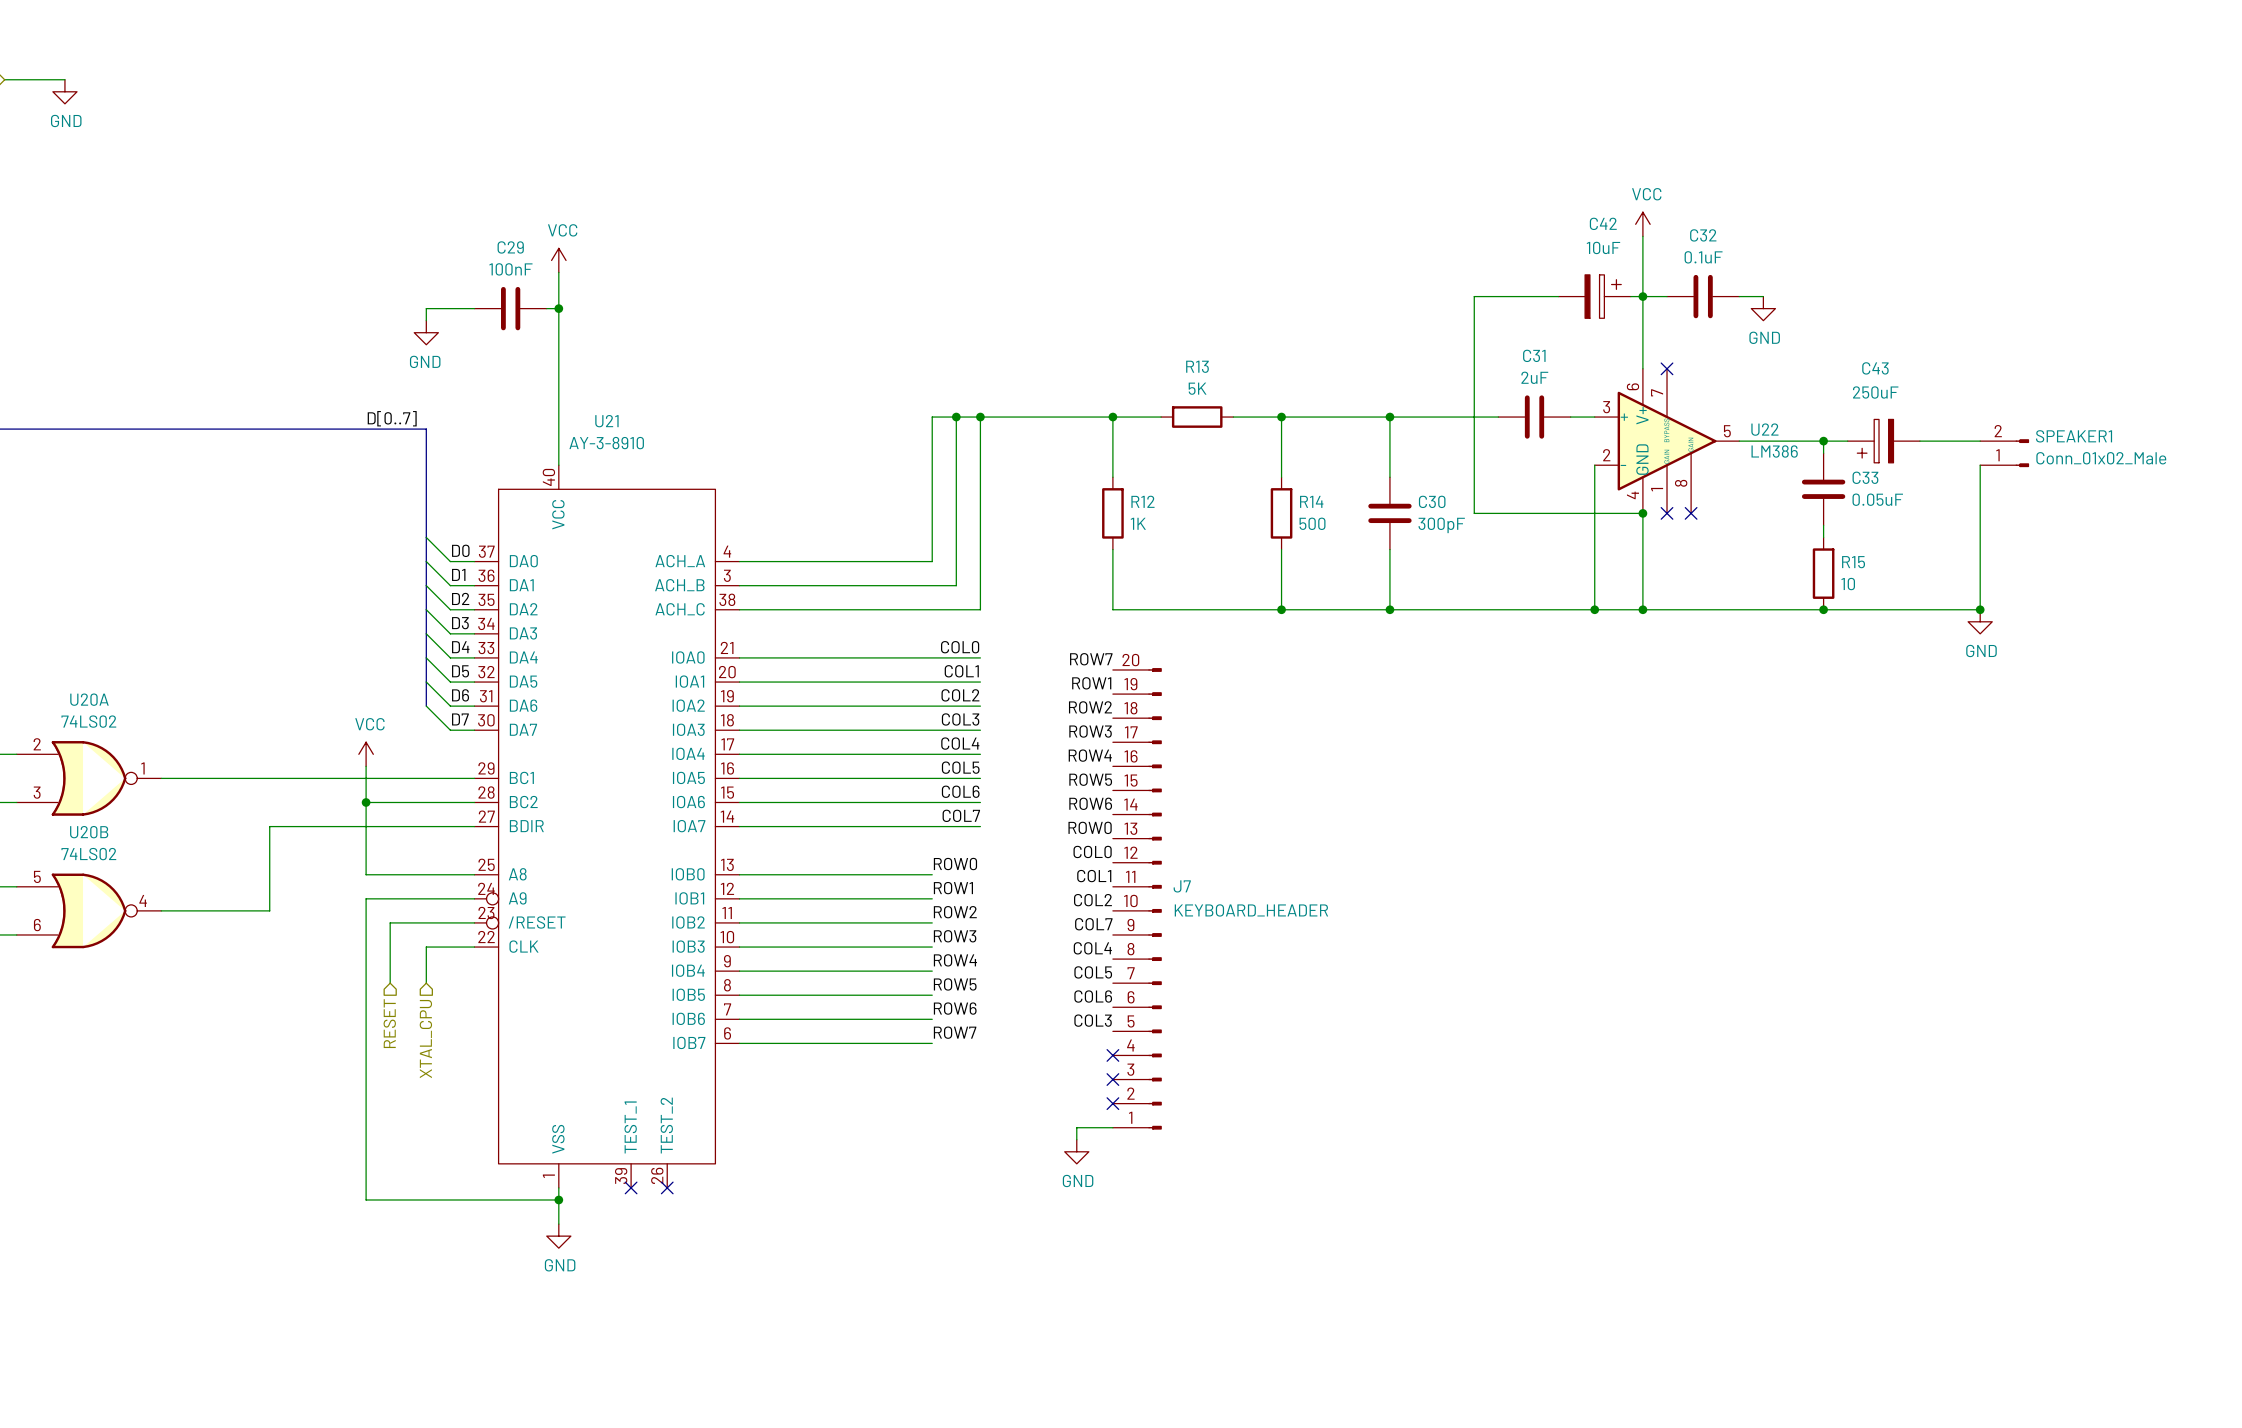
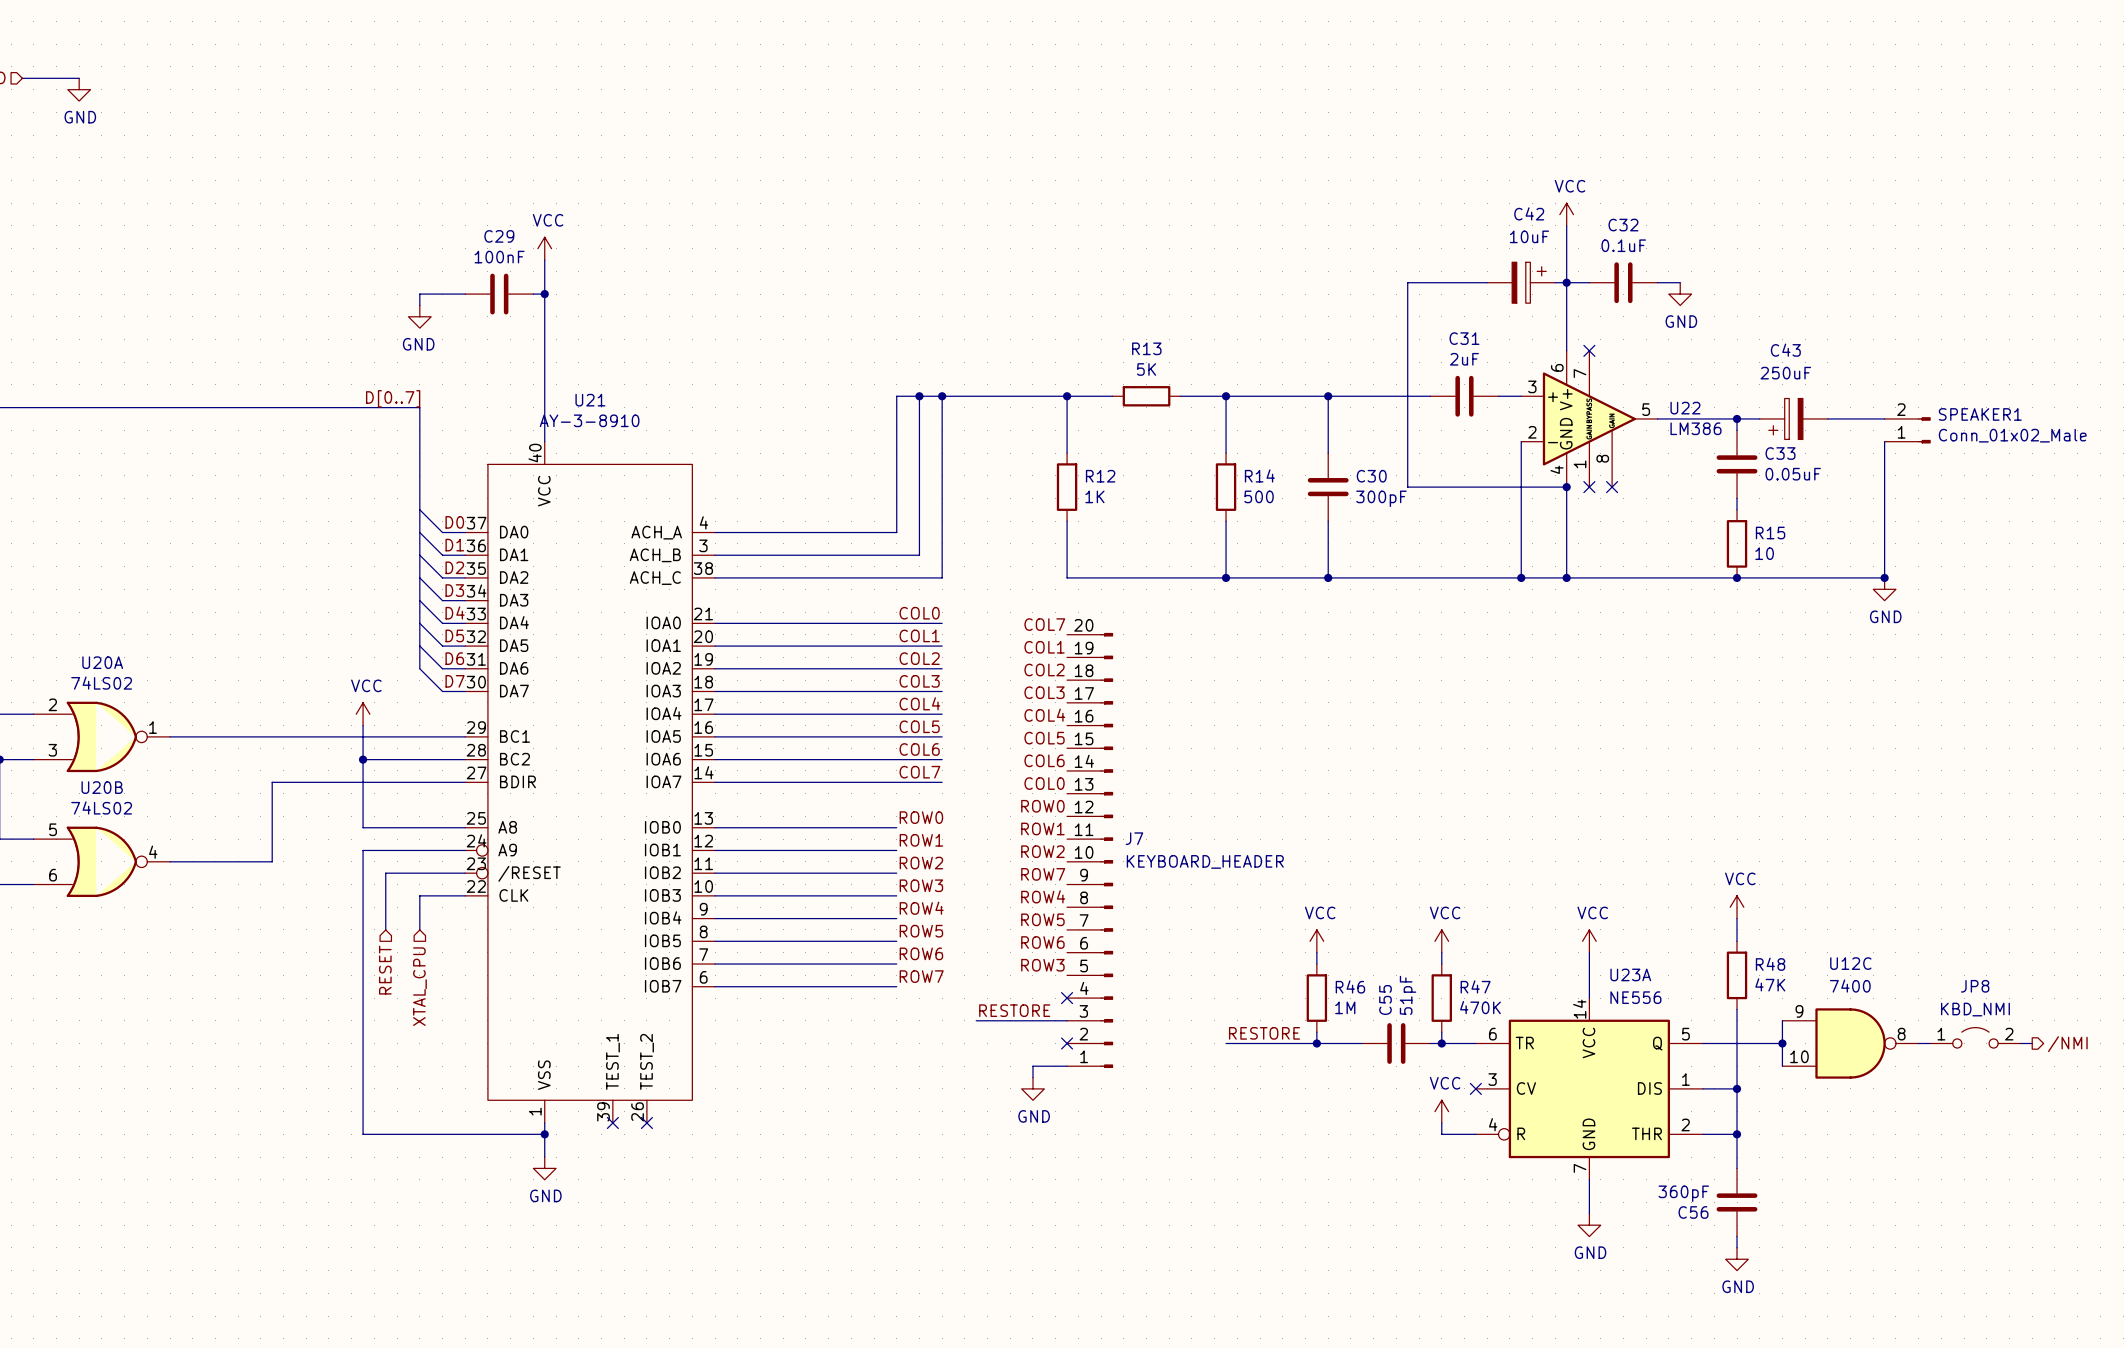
label: ROW7 (1091, 659) -> COL7 (1044, 624)
label: ROW1 (1091, 683) -> COL1 (1044, 647)
label: ROW2 (1090, 707) -> COL2 (1044, 670)
label: ROW3 (1090, 731) -> COL3 (1044, 692)
label: ROW4 (1090, 755) -> COL4 (1044, 715)
label: ROW5 (1090, 779) -> COL5 (1044, 738)
label: ROW6 (1090, 803) -> COL6 (1044, 760)
label: ROW0 (1090, 827) -> COL0 (1044, 783)
label: COL0 (1092, 851) -> ROW0 (1042, 806)
label: COL1 (1094, 876) -> ROW1 (1042, 828)
label: COL2 (1092, 900) -> ROW2 (1042, 851)
label: COL7 (1093, 924) -> ROW7 (1043, 874)
label: COL4 (1092, 948) -> ROW4 (1043, 896)
power symbol: none -> VCC (1737, 907)
wire: none -> (1737, 918) (1737, 941)
label: COL5 (1093, 972) -> ROW5 (1042, 919)
power symbol: none -> VCC (1316, 941)
power symbol: none -> VCC (1441, 941)
power symbol: none -> VCC (1589, 941)
label: COL6 (1093, 996) -> ROW6 (1042, 942)
wire: none -> (1316, 952) (1316, 964)
wire: none -> (1441, 952) (1441, 964)
wire: none -> (1589, 952) (1589, 998)
label: COL3 (1093, 1020) -> ROW3 (1042, 965)
R48: none -> 47K (1737, 975)
R46: none -> 1M (1316, 998)
R47: none -> 470K (1441, 998)
wire: none -> (1737, 1009) (1737, 1168)
label: none -> RESTORE (1014, 1010)
wire: none -> (976, 1020) (1067, 1020)
no-connect mark: (1112, 1079) -> none
wire: none -> (1782, 1020) (1782, 1066)
wire: none -> (1316, 1032) (1316, 1043)
wire: none -> (1441, 1032) (1441, 1043)
label: none -> RESTORE (1264, 1033)
JP8: none -> KBD_NMI (1975, 1037)
wire: none -> (1226, 1043) (1362, 1043)
junction: none -> (1316, 1043)
C55: none -> 51pF (1396, 1043)
wire: none -> (1430, 1043) (1475, 1043)
junction: none -> (1441, 1043)
wire: none -> (1702, 1043) (1782, 1043)
junction: none -> (1782, 1043)
U12C: none -> 7400 (1850, 1043)
wire: none -> (1918, 1043) (1930, 1043)
wire: none -> (2020, 1043) (2032, 1043)
hierarchical label: none -> /NMI (2067, 1044)
no-connect mark: none -> (1475, 1088)
U23A: none -> NE556 (1589, 1088)
wire: none -> (1702, 1088) (1737, 1088)
junction: none -> (1737, 1088)
power symbol: none -> VCC (1441, 1111)
wire: none -> (1441, 1122) (1441, 1134) (1475, 1134)
wire: none -> (1702, 1134) (1737, 1134)
junction: none -> (1737, 1134)
wire: none -> (1589, 1179) (1589, 1213)
C56: none -> 360pF (1737, 1202)
power symbol: none -> GND (1589, 1225)
wire: none -> (1737, 1236) (1737, 1247)
power symbol: none -> GND (1737, 1259)

